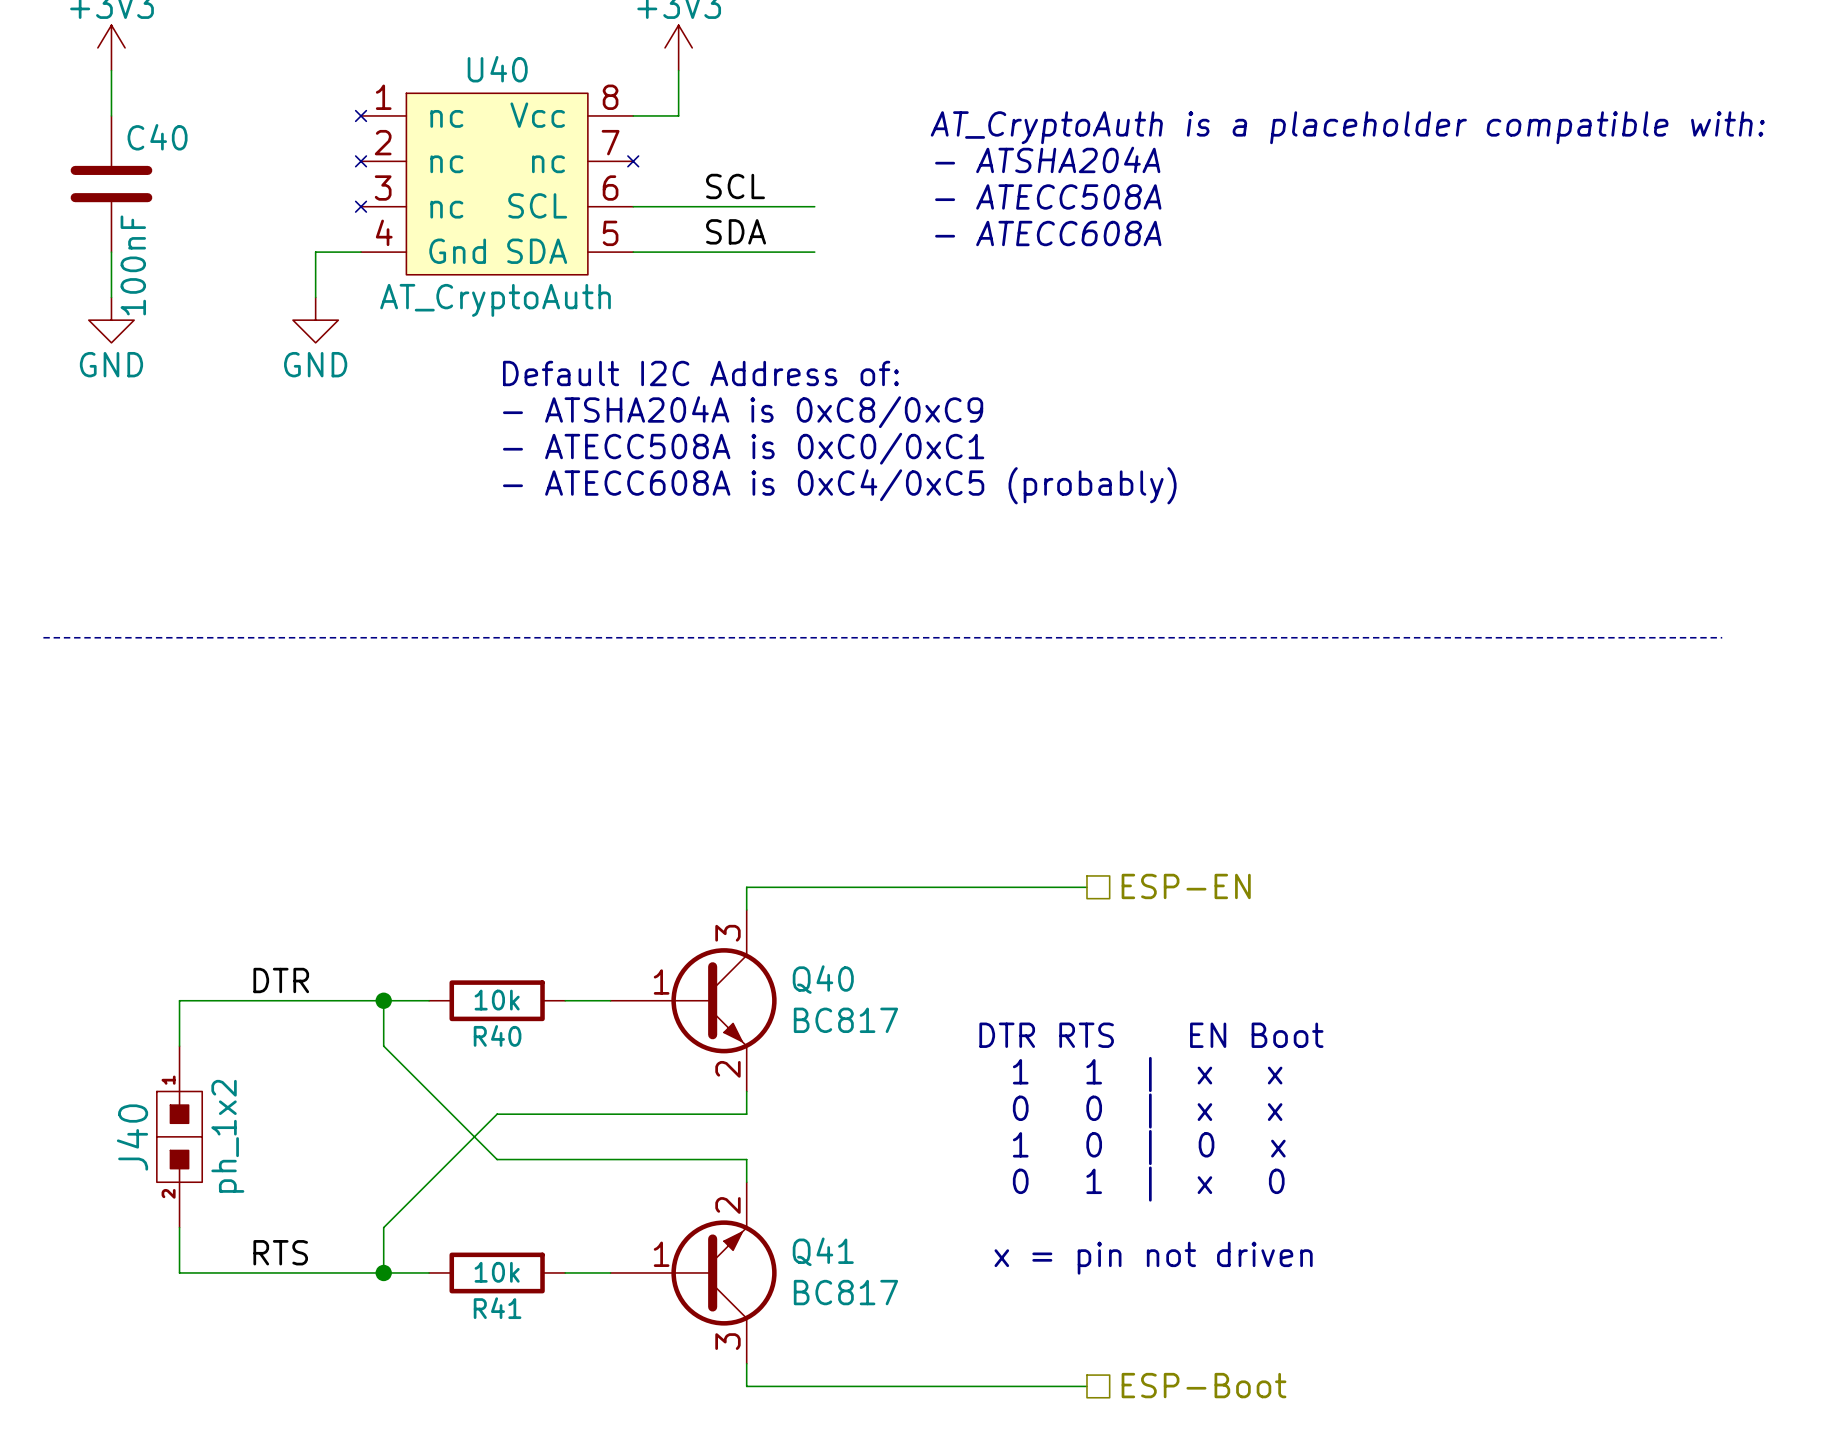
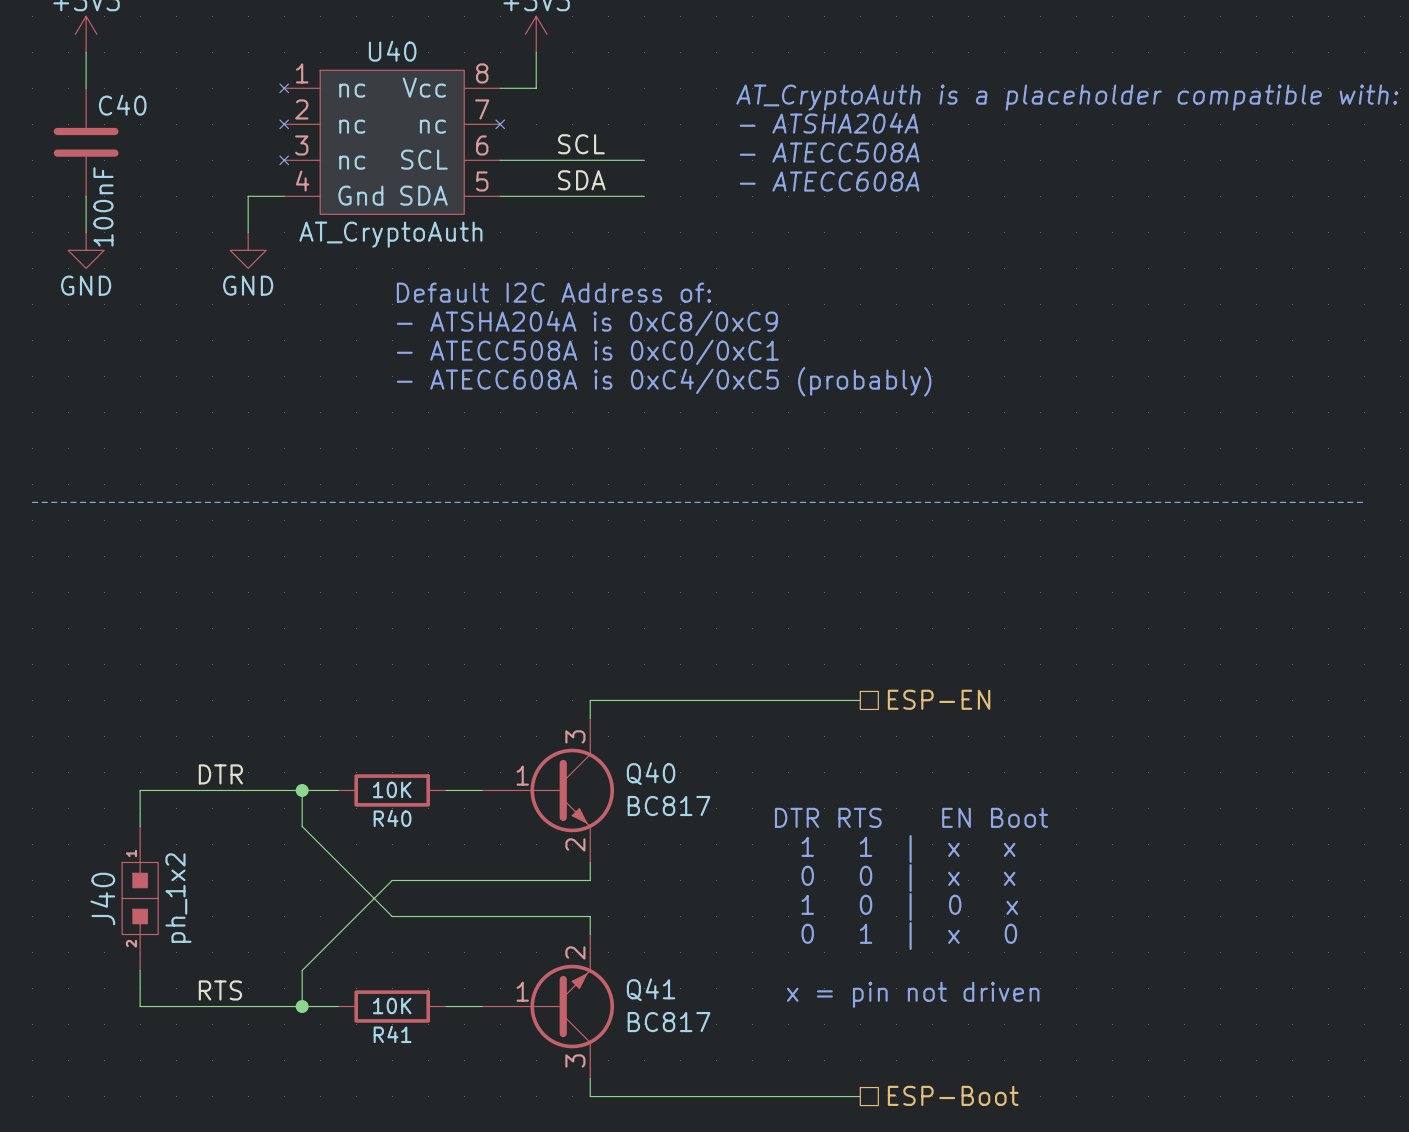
R40 value: 10k (497, 1000) -> 10K (392, 789)
R41 value: 10k (497, 1272) -> 10K (392, 1005)

